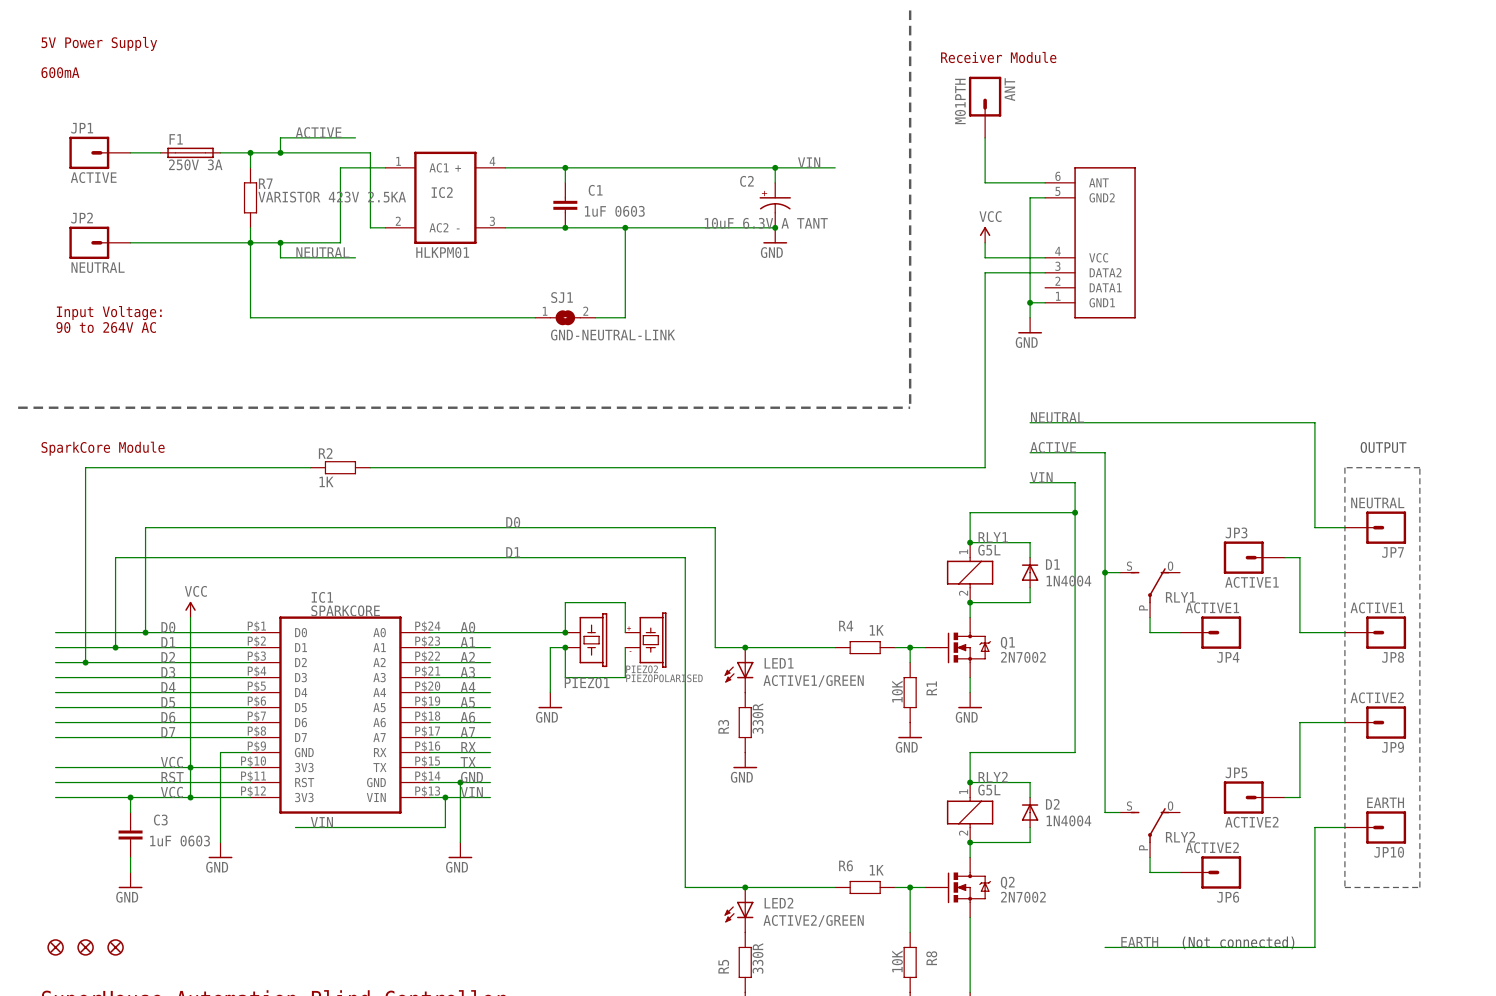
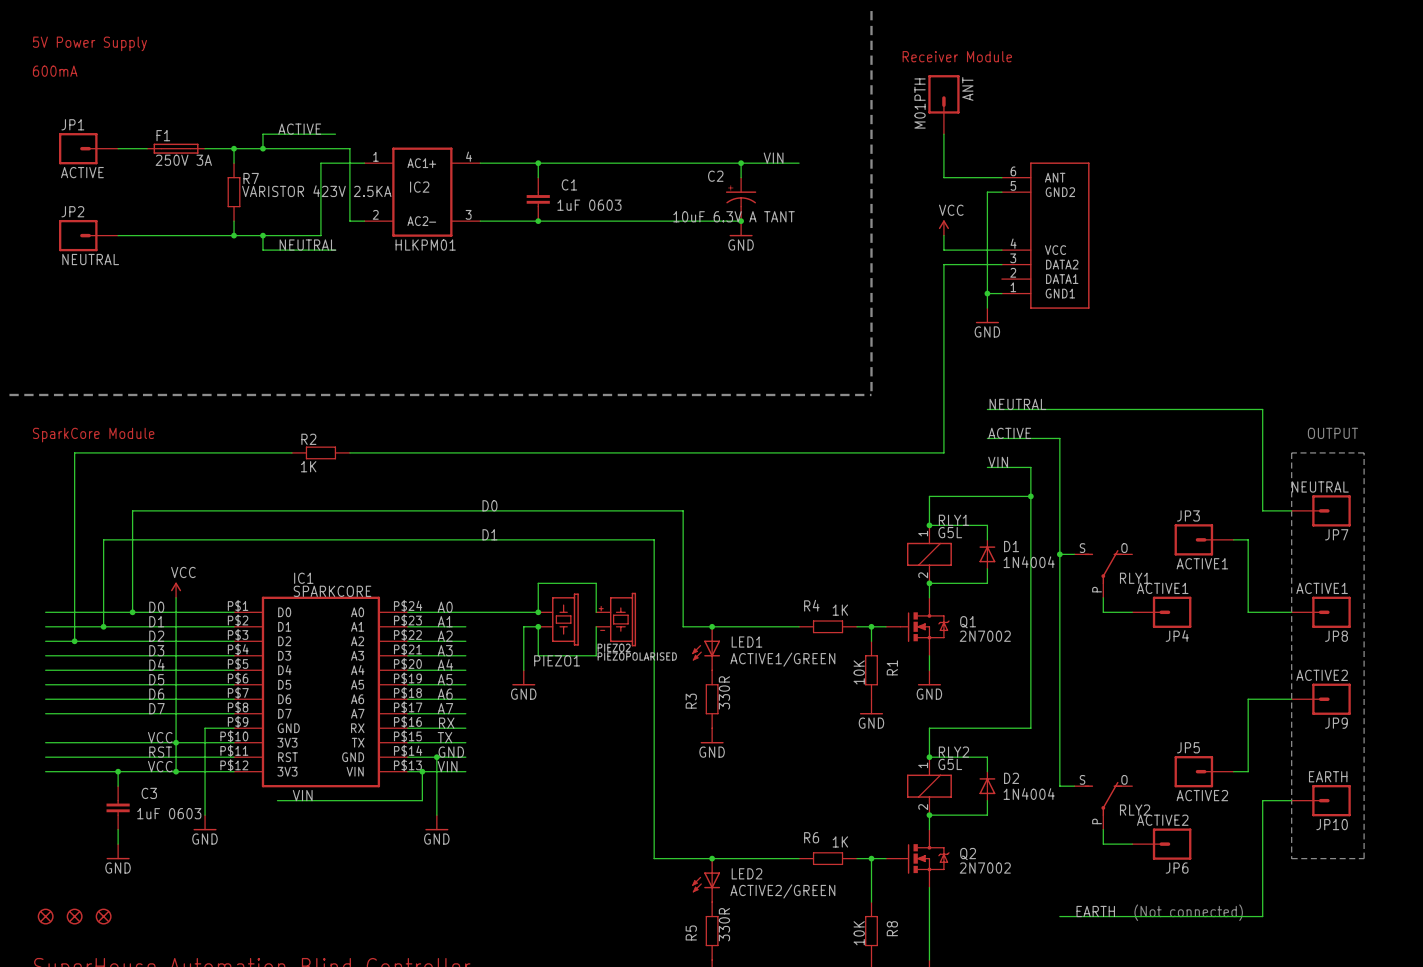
wire: (625, 227) (625, 317) (595, 317) -> none
junction: (625, 227) -> none
wire: (250, 242) (250, 317) (535, 317) -> none
text: Input Voltage: (109, 313) -> none
SJ1: GND-NEUTRAL-LINK (565, 317) -> none
text: 90 to 264V AC (106, 327) -> none

